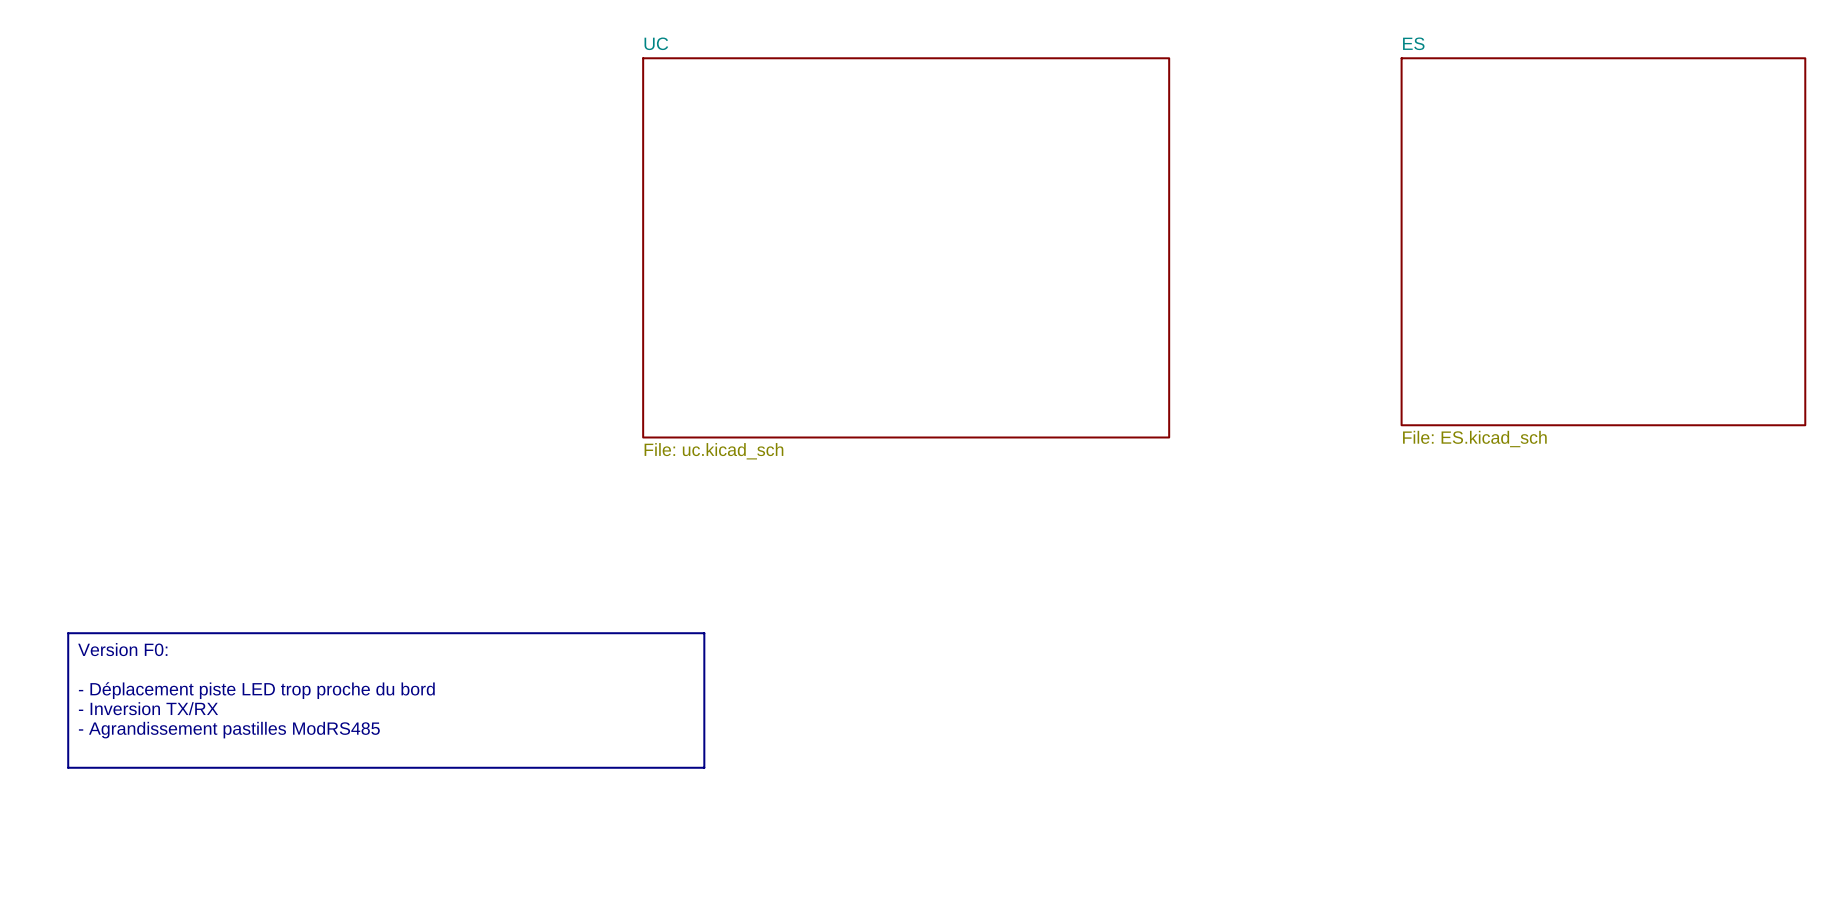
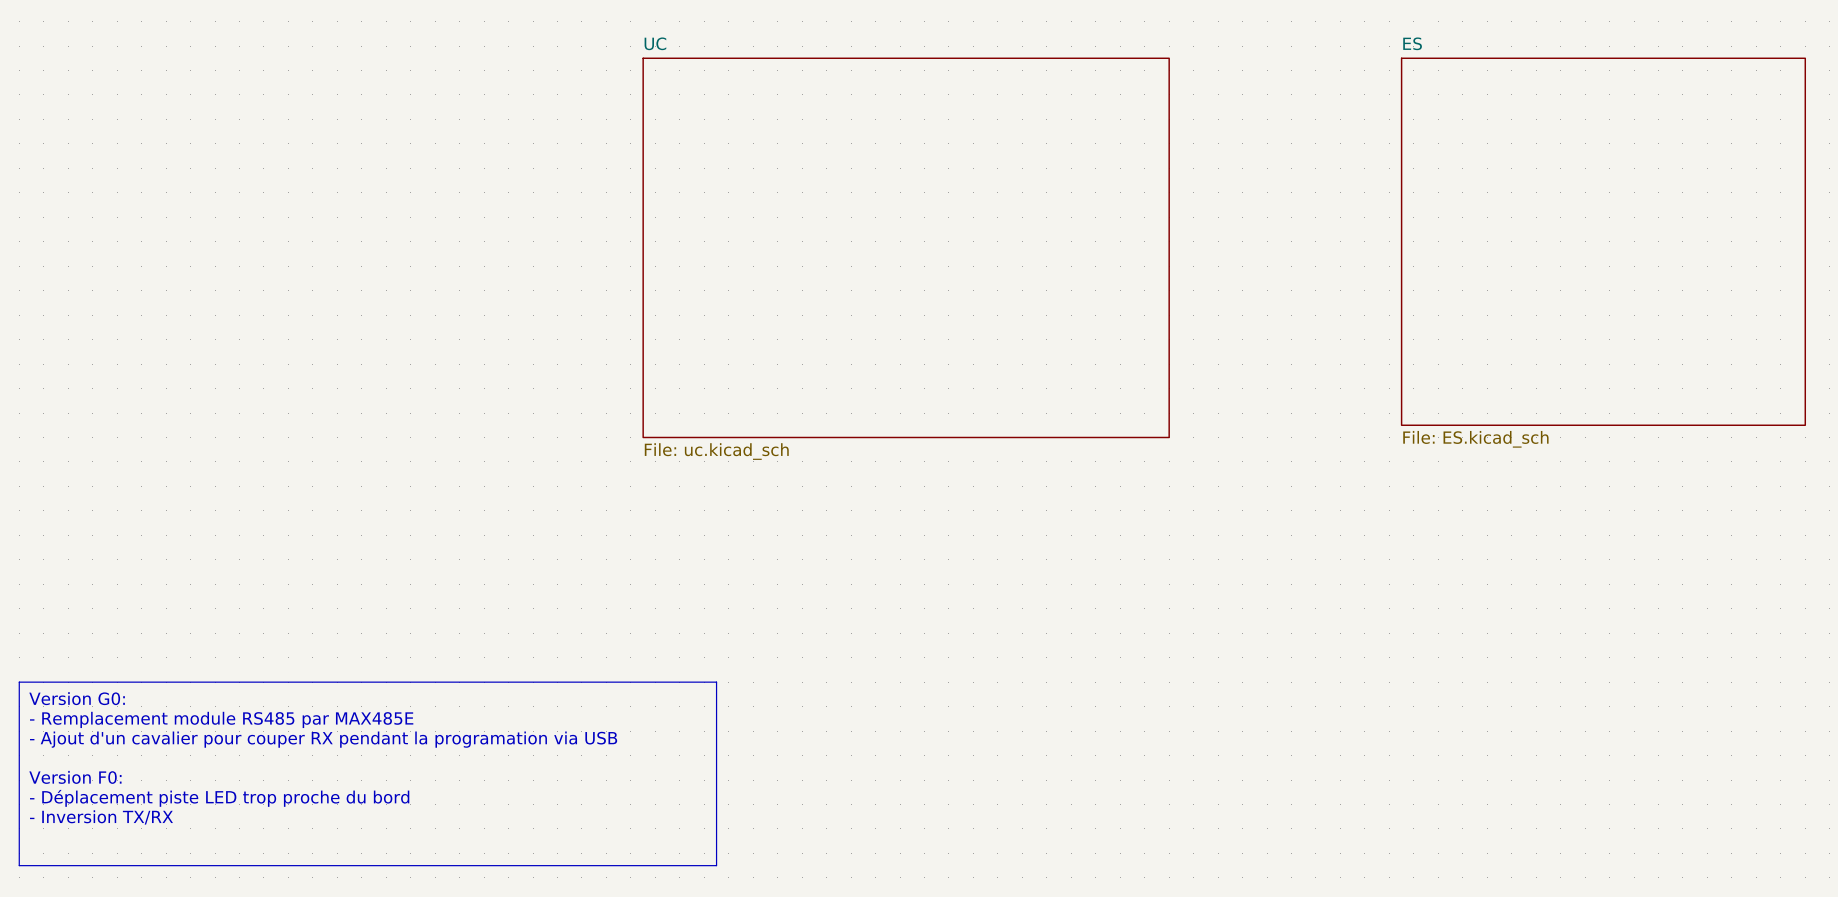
line: (68, 633) (704, 633) (704, 767) (68, 767) (68, 633) -> none
text position: Version F0: (122, 649) -> Version F0: (75, 777)
line: none -> (19, 682) (716, 682) (716, 865) (19, 865) (19, 682)
text position: - Déplacement piste LED trop proche du bord (256, 690) -> - Déplacement piste LED trop proche du bord (219, 798)
text: none -> Version G0: (77, 698)
text position: - Inversion TX/RX (148, 708) -> - Inversion TX/RX (101, 817)
text: none -> - Remplacement module RS485 par MAX485E (221, 719)
text: - Agrandissement pastilles ModRS485 (229, 730) -> none
text: none -> - Ajout d'un cavalier pour couper RX pendant la programation via USB (323, 739)

